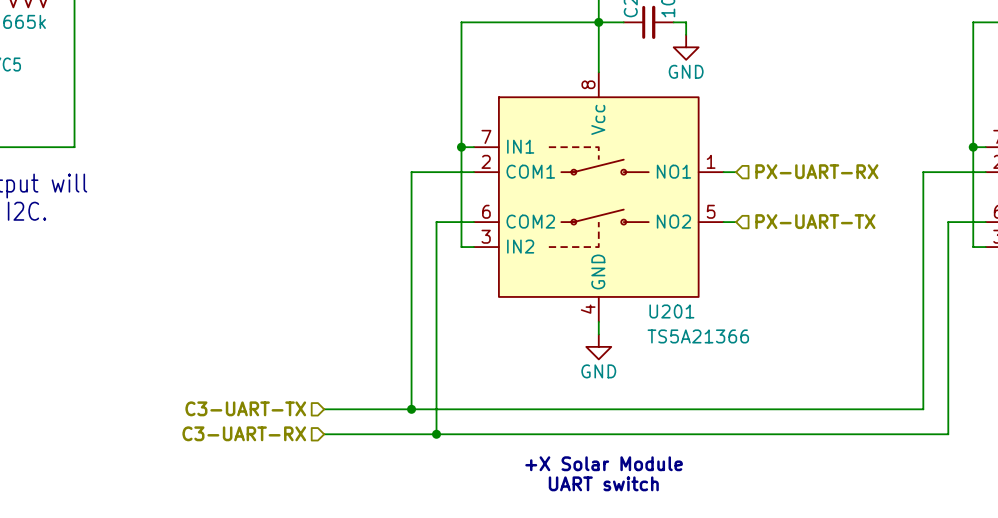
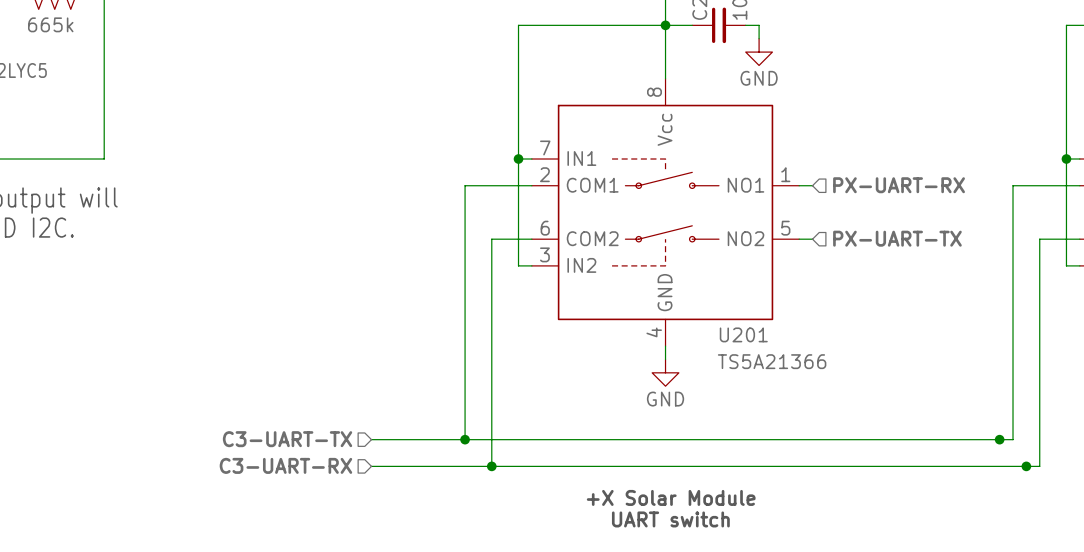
junction: none -> (999, 439)
junction: none -> (1026, 466)

